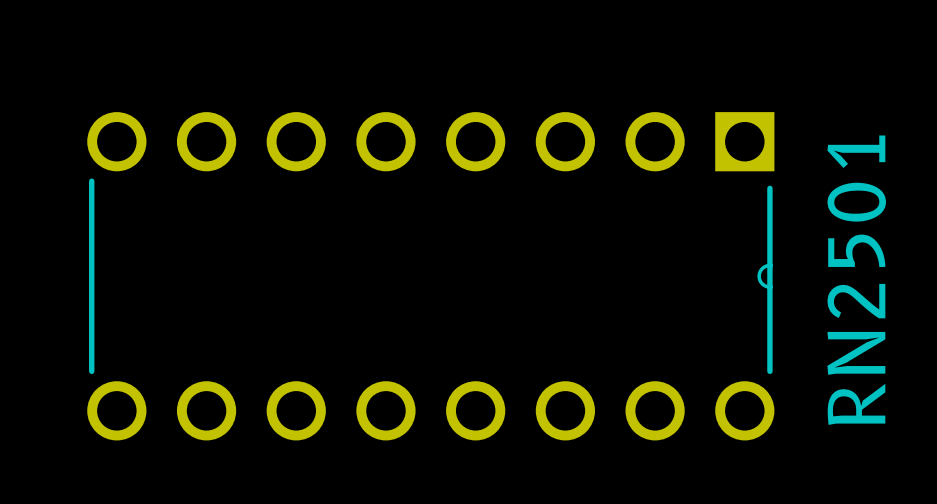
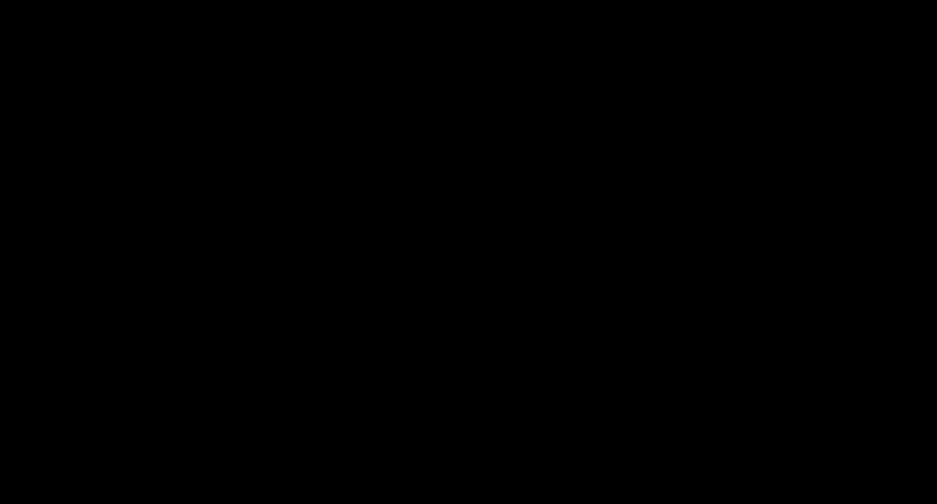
RN2501: (430, 276) -> none

